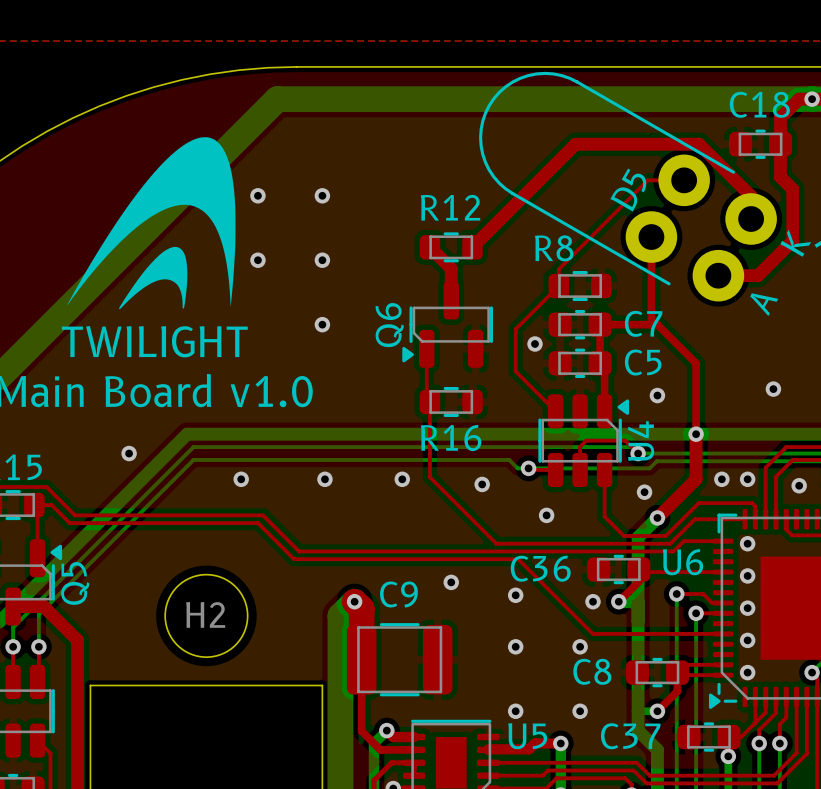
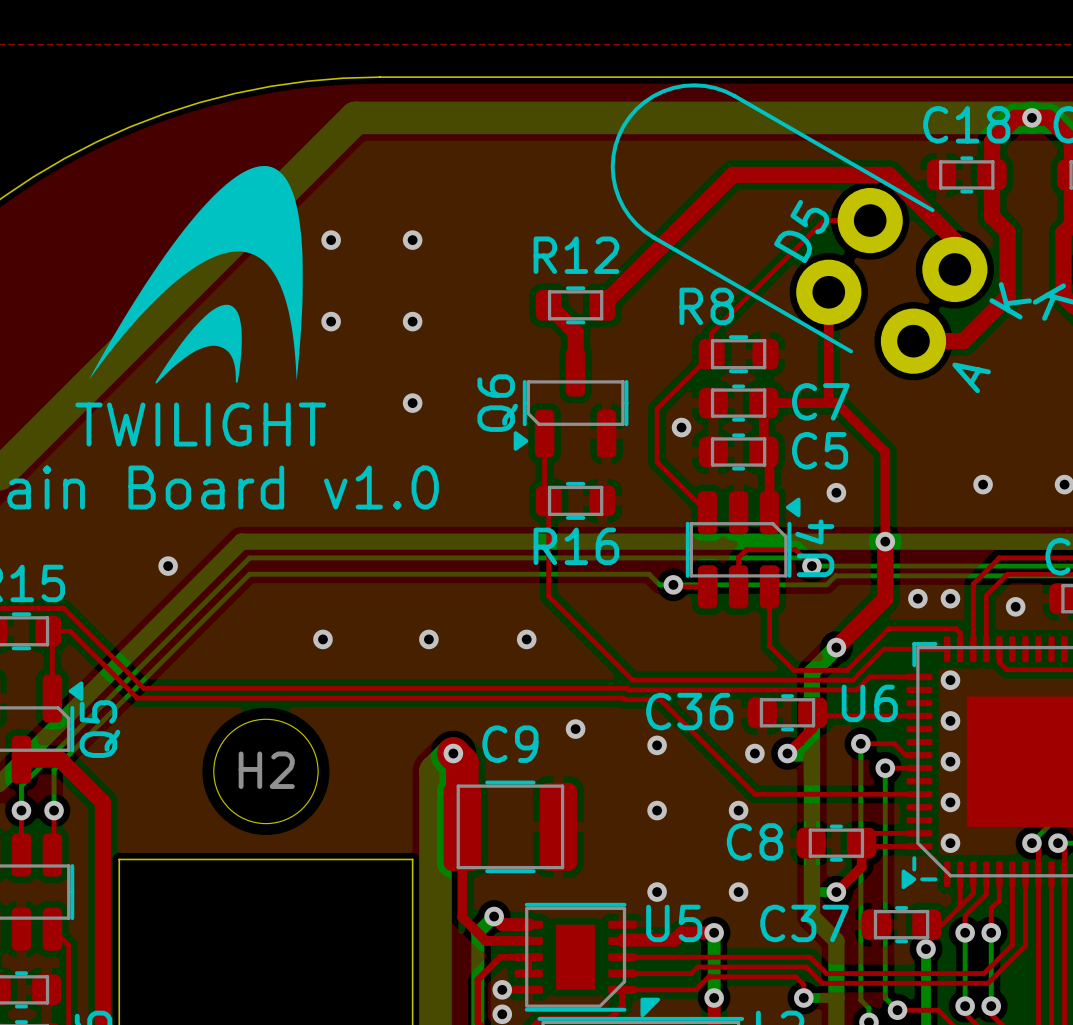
via position: (241, 479) -> (322, 639)
via position: (324, 479) -> (428, 639)
via position: (402, 479) -> (526, 639)
via: (482, 484) -> none
via: (644, 492) -> none
top track: (74, 515) (263, 515) (299, 551) (493, 551) -> (99, 644) (143, 688) (626, 688) (628, 689)
via: (546, 515) -> none
top track: (69, 523) (257, 523) (294, 559) (489, 559) -> (93, 654) (137, 698) (622, 698) (624, 699)

